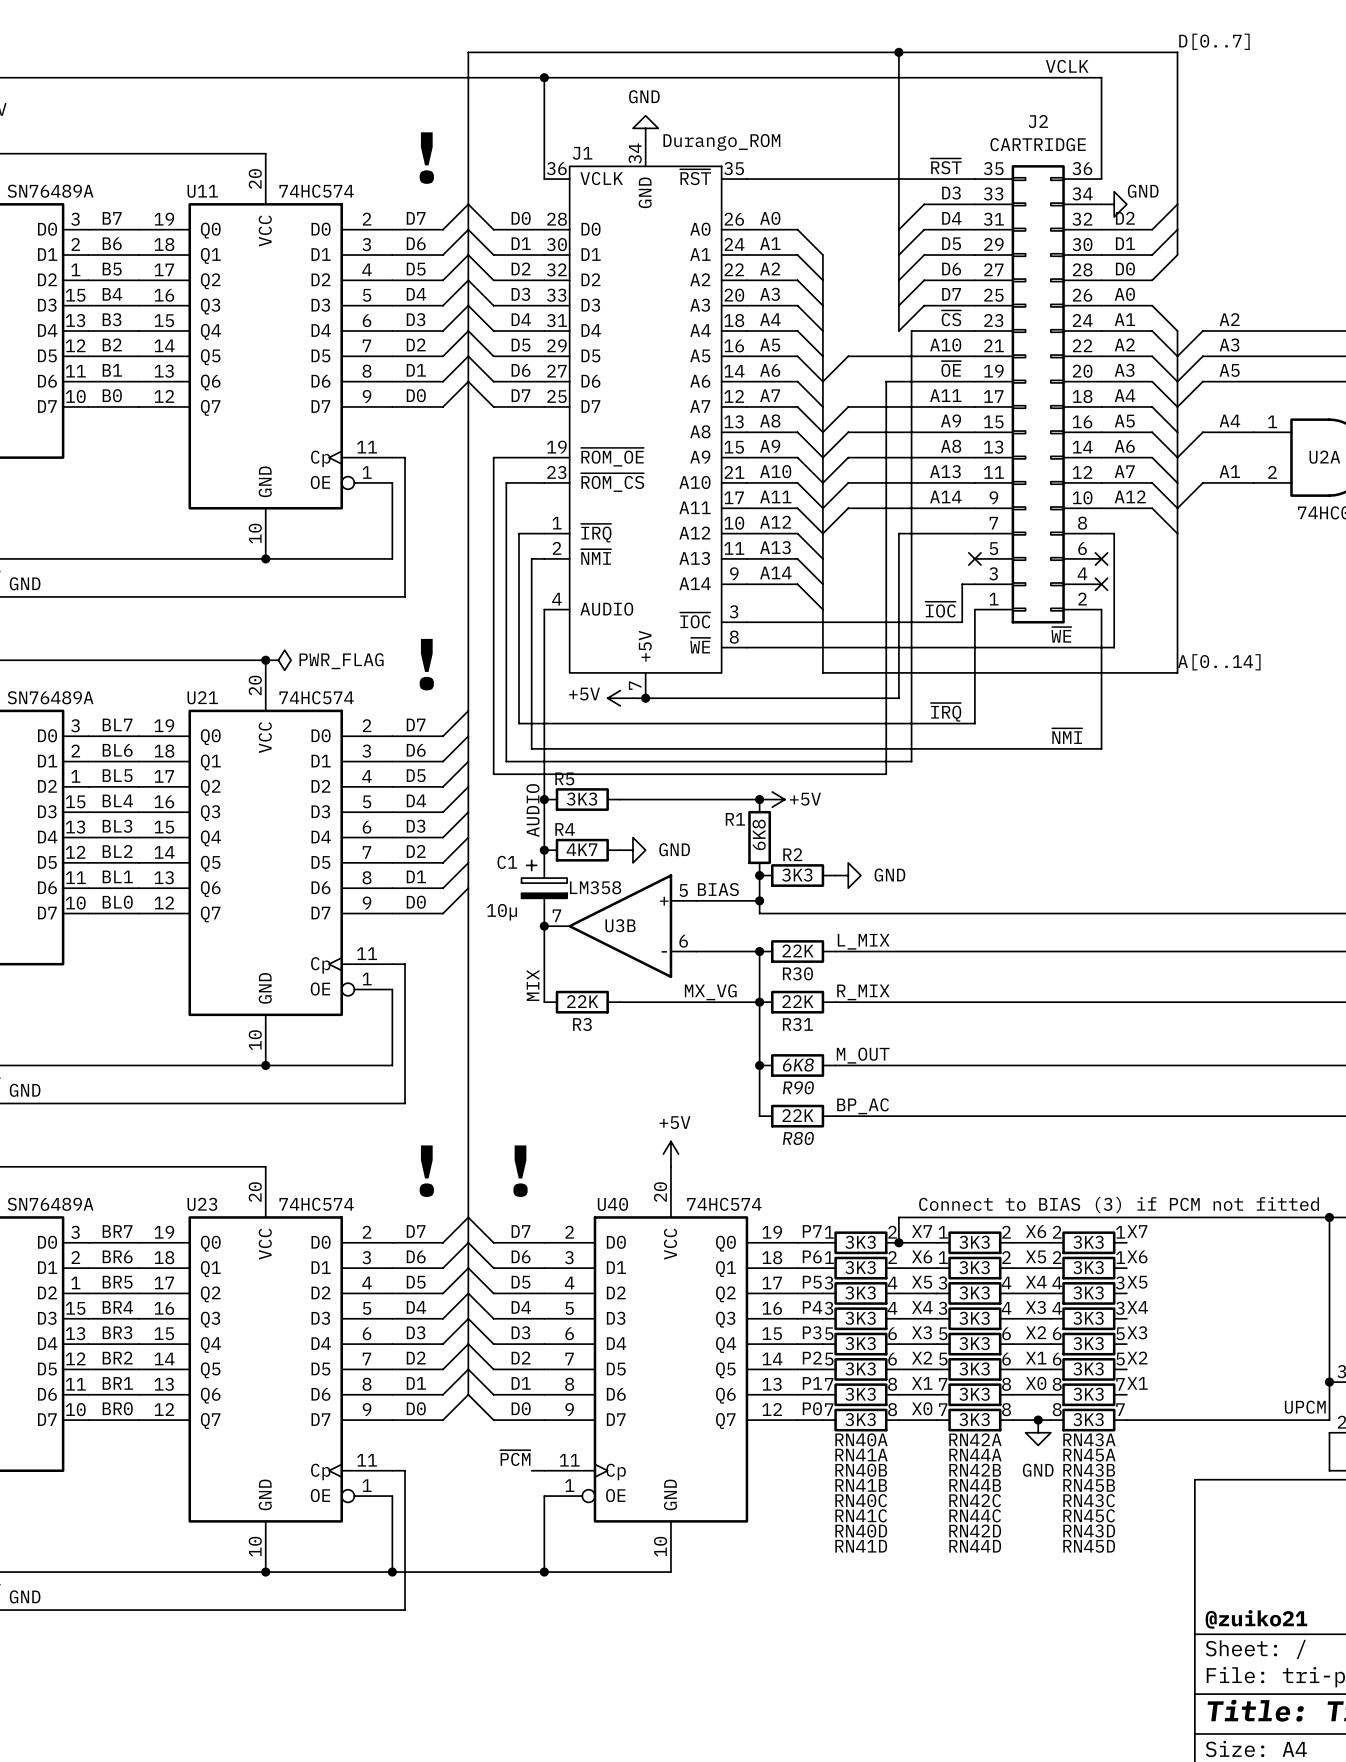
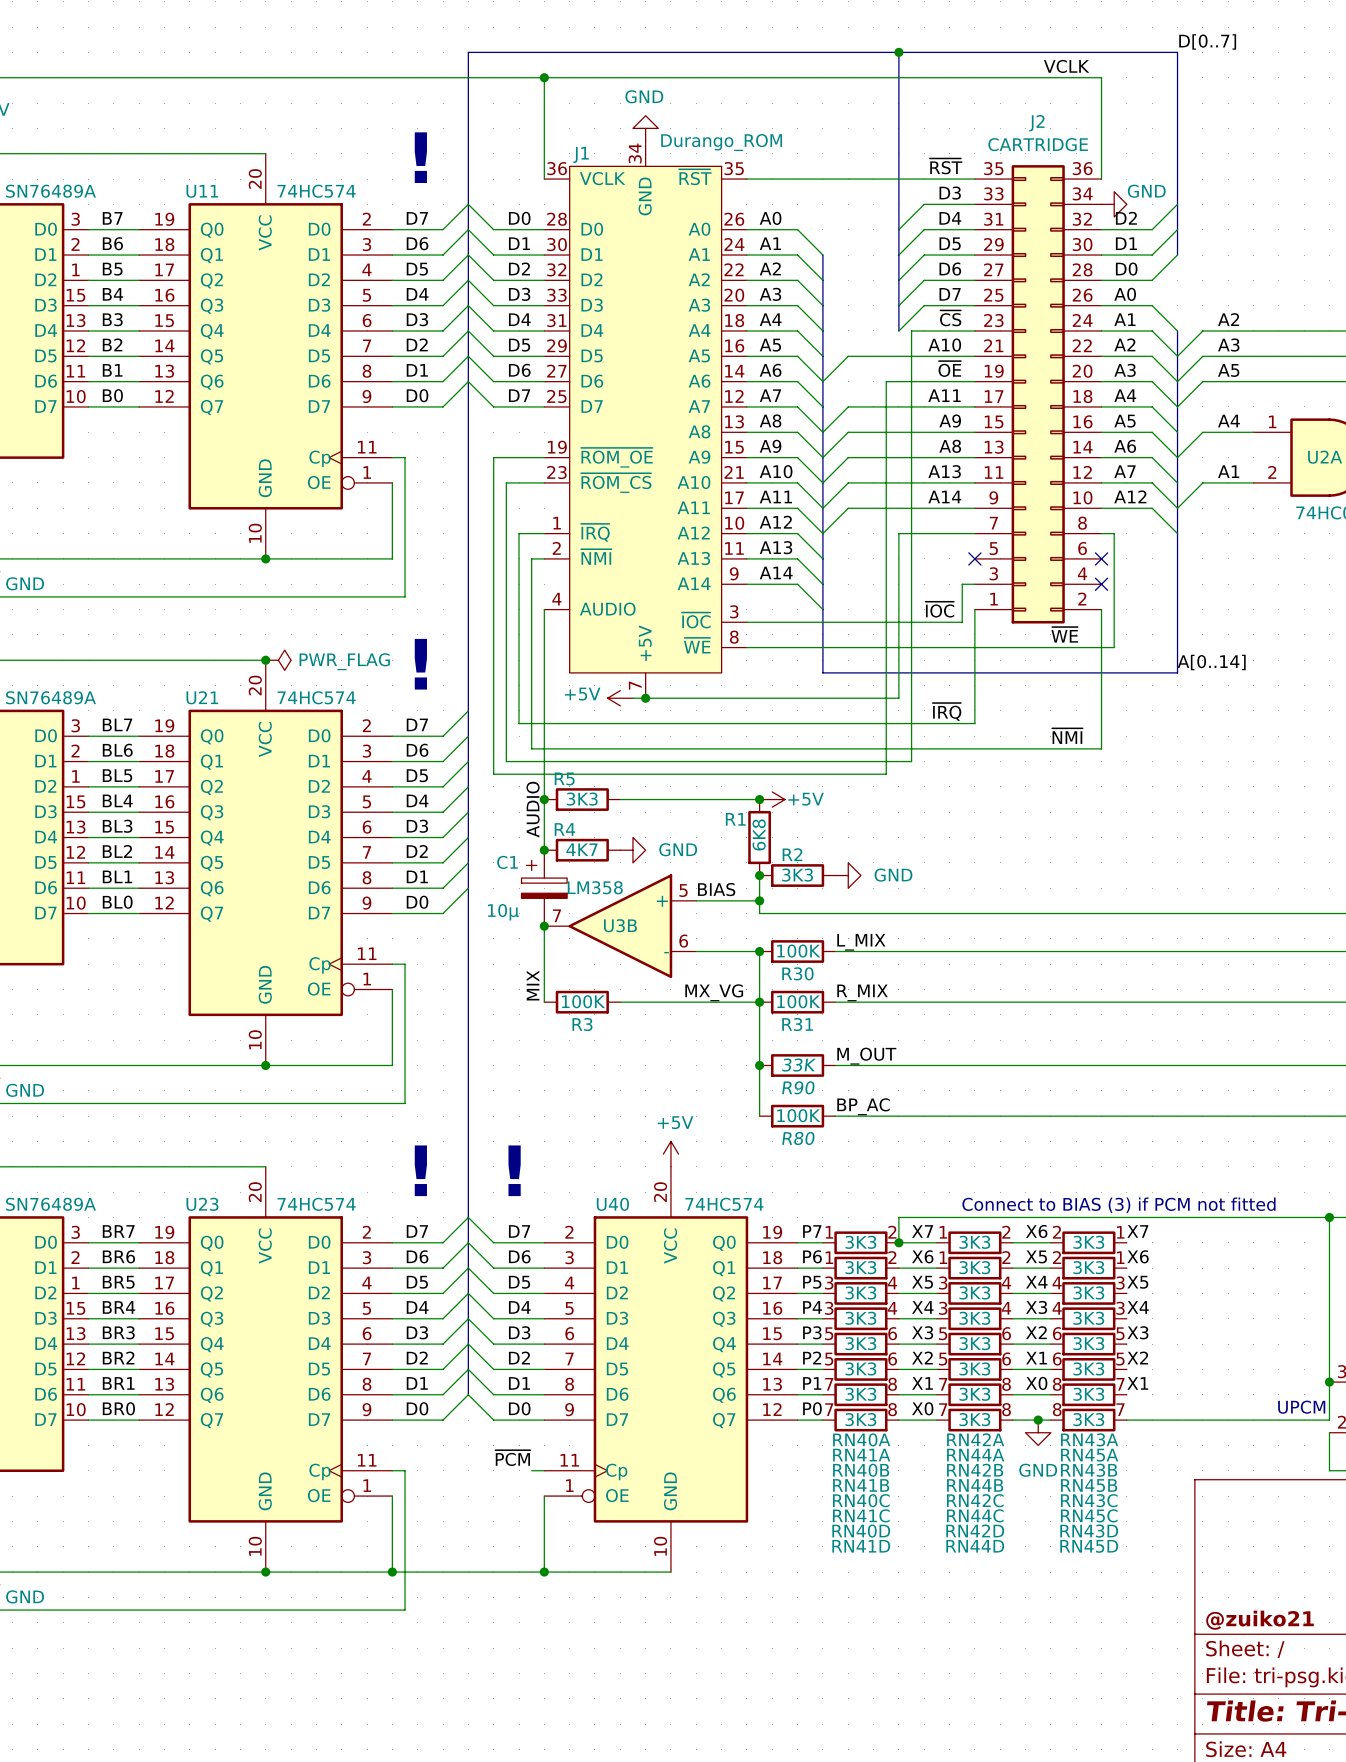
R30 value: 22K (797, 950) -> 100K (798, 951)
R3 value: 22K (582, 1001) -> 100K (583, 1001)
R31 value: 22K (797, 1001) -> 100K (798, 1001)
R90 value: 6K8 (798, 1065) -> 33K (799, 1065)
R80 value: 22K (797, 1115) -> 100K (798, 1115)

